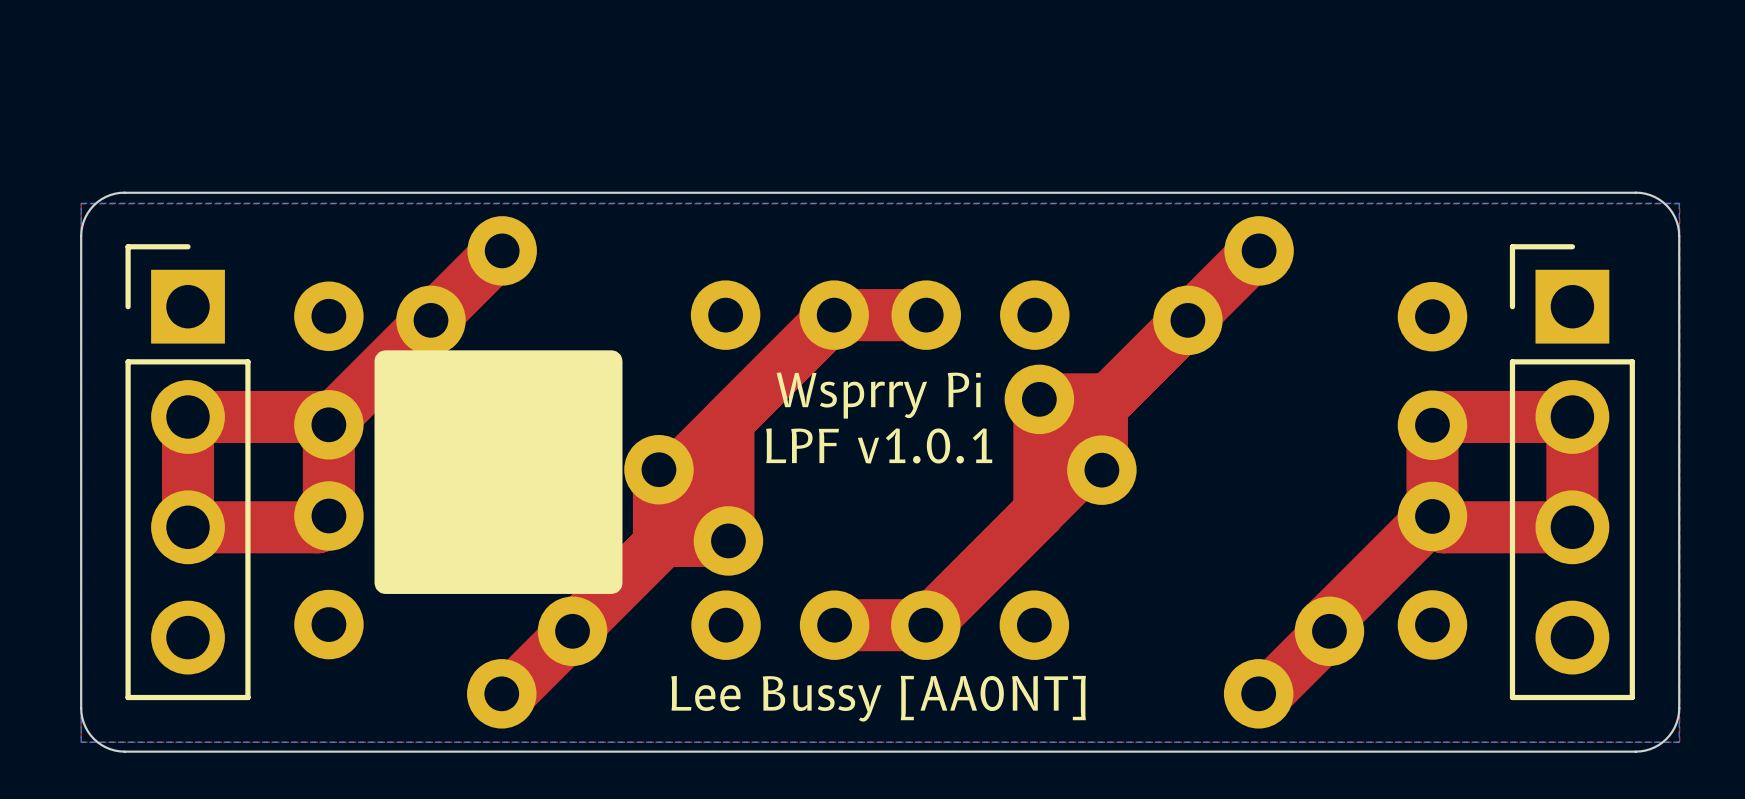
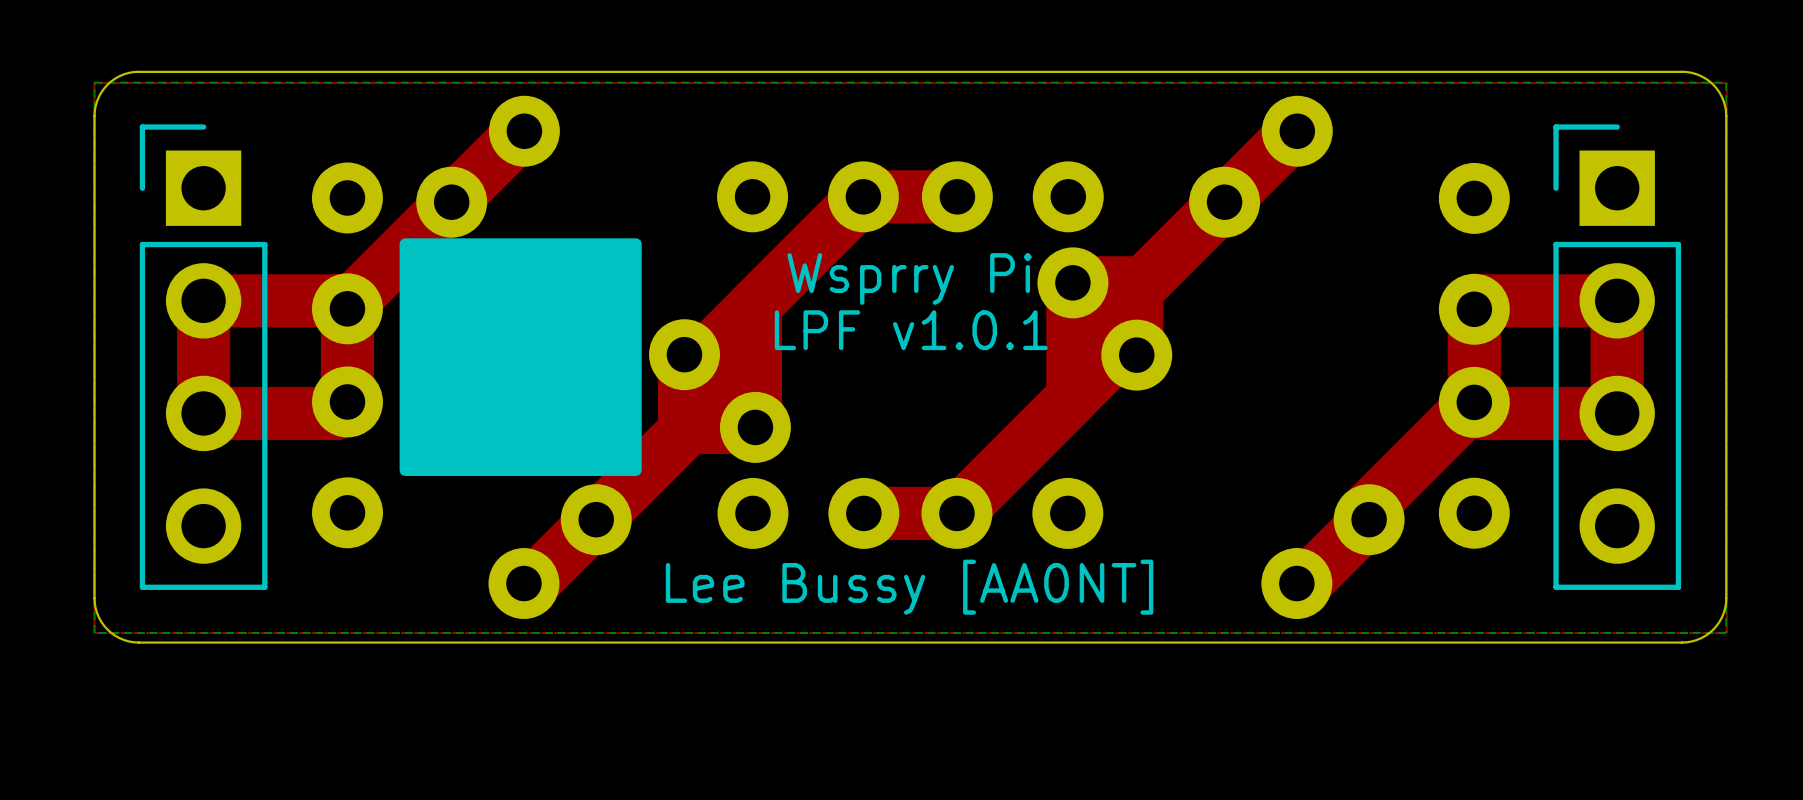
drawing shape: [374, 350, 623, 594] -> [399, 238, 642, 476]

